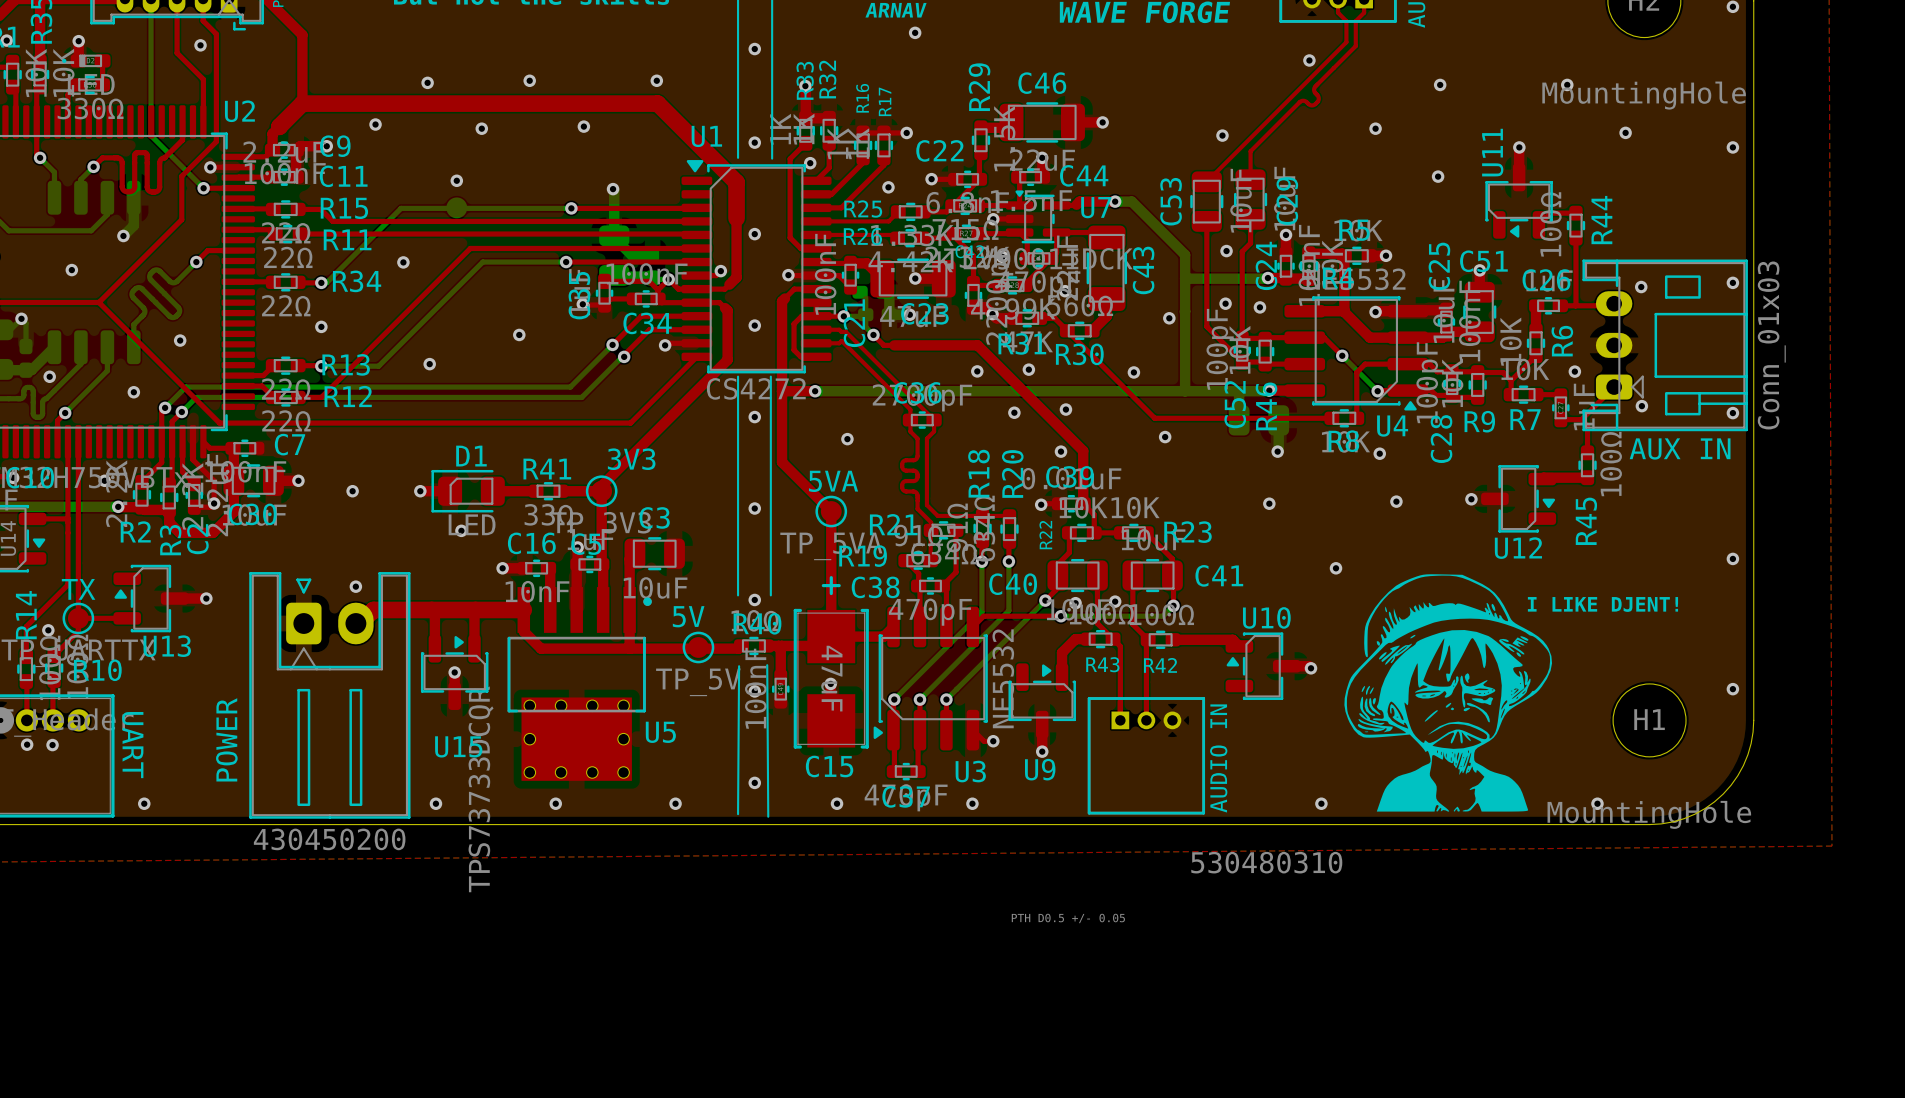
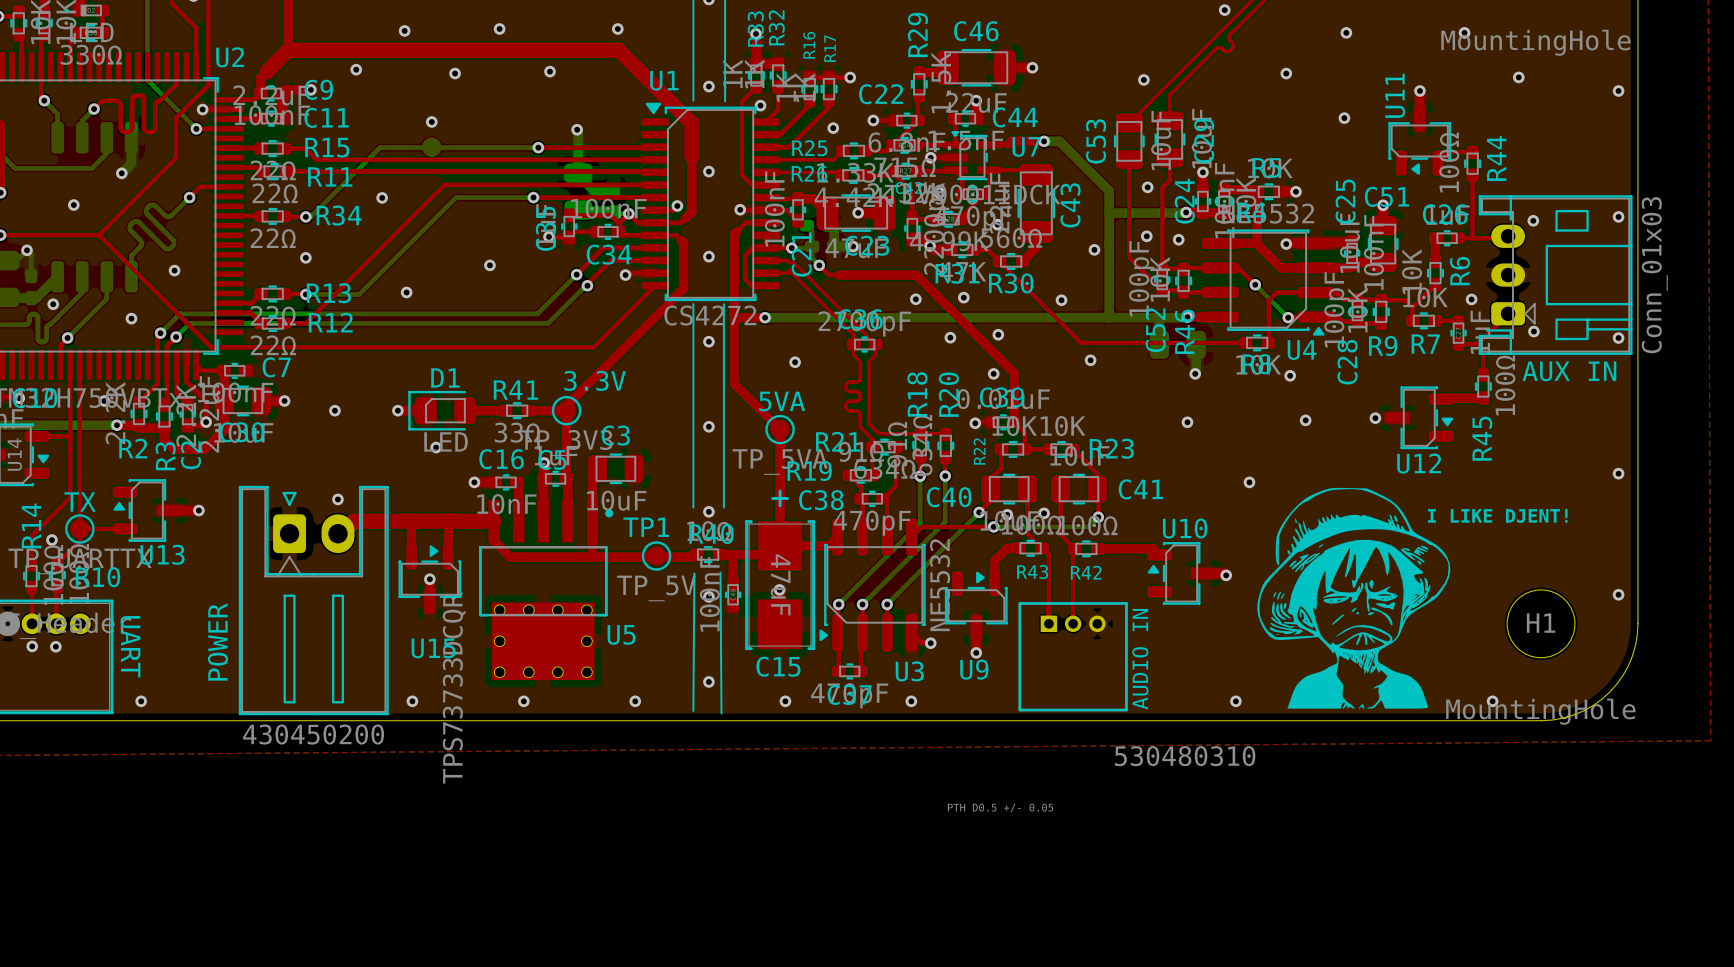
3V3 name: 3V3 (631, 459) -> 3.3V (595, 380)
5V name: 5V (688, 616) -> TP1 (646, 527)

